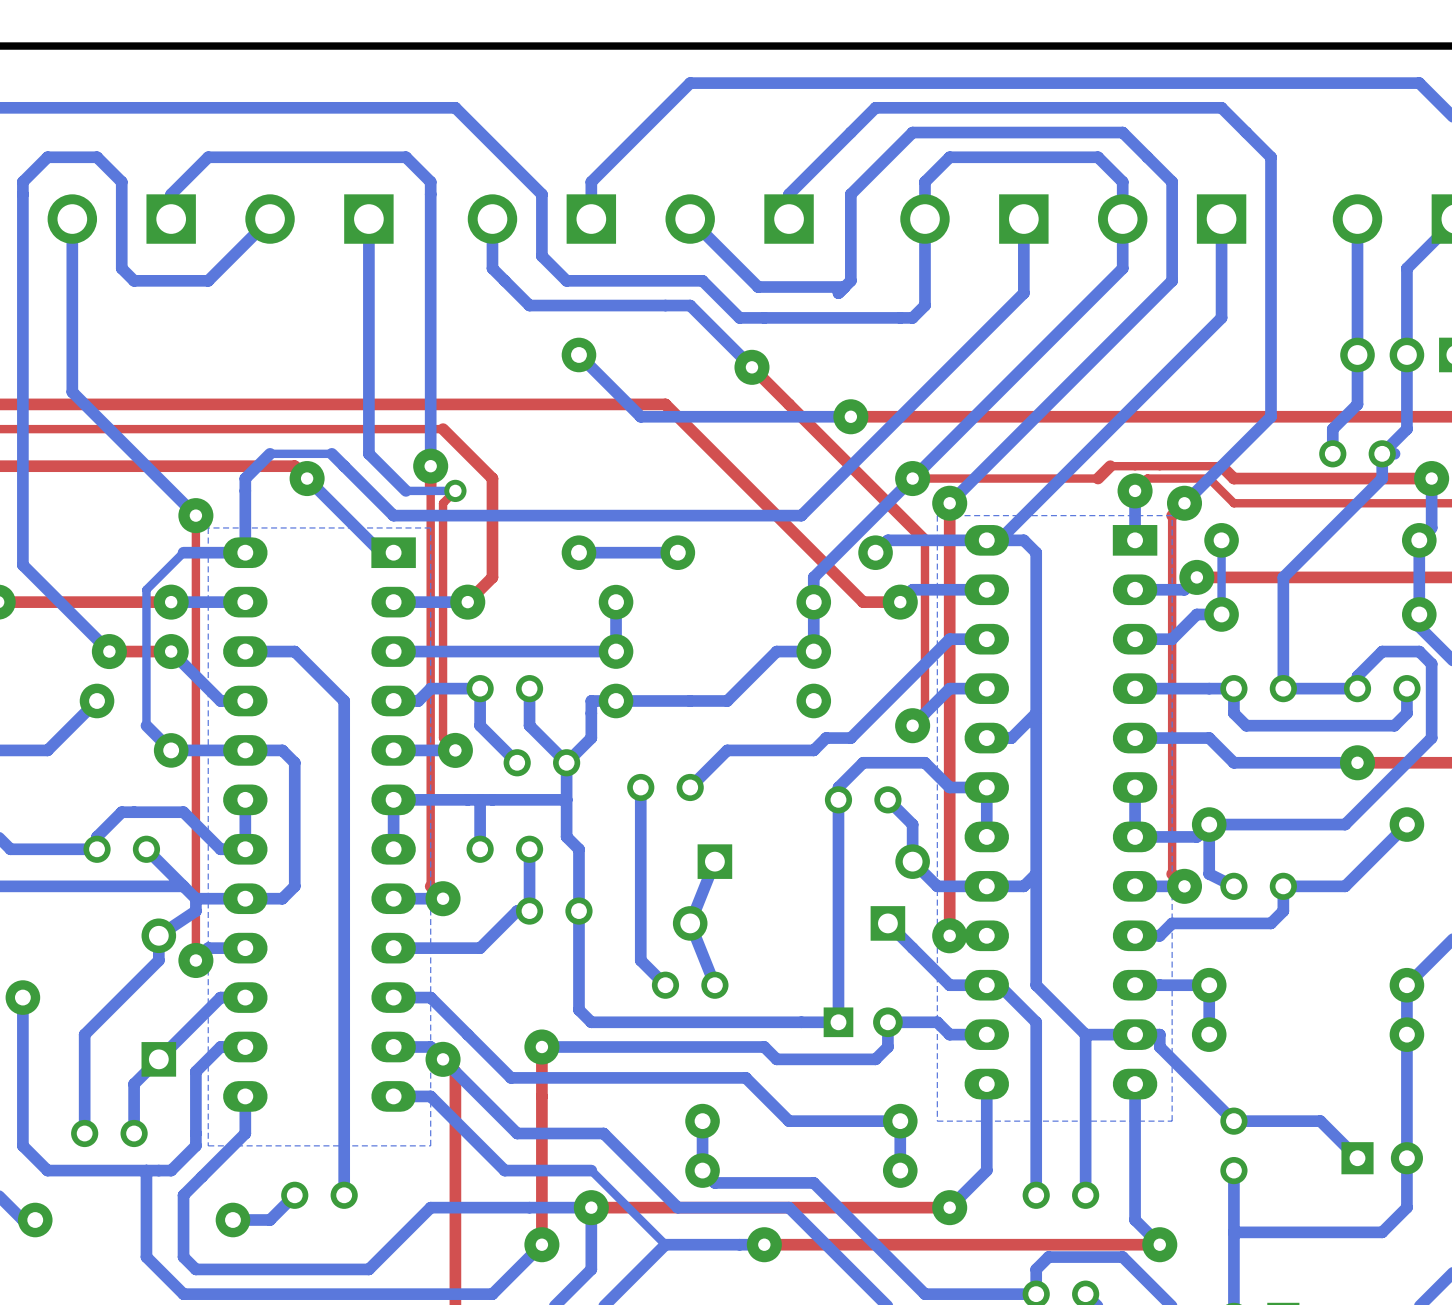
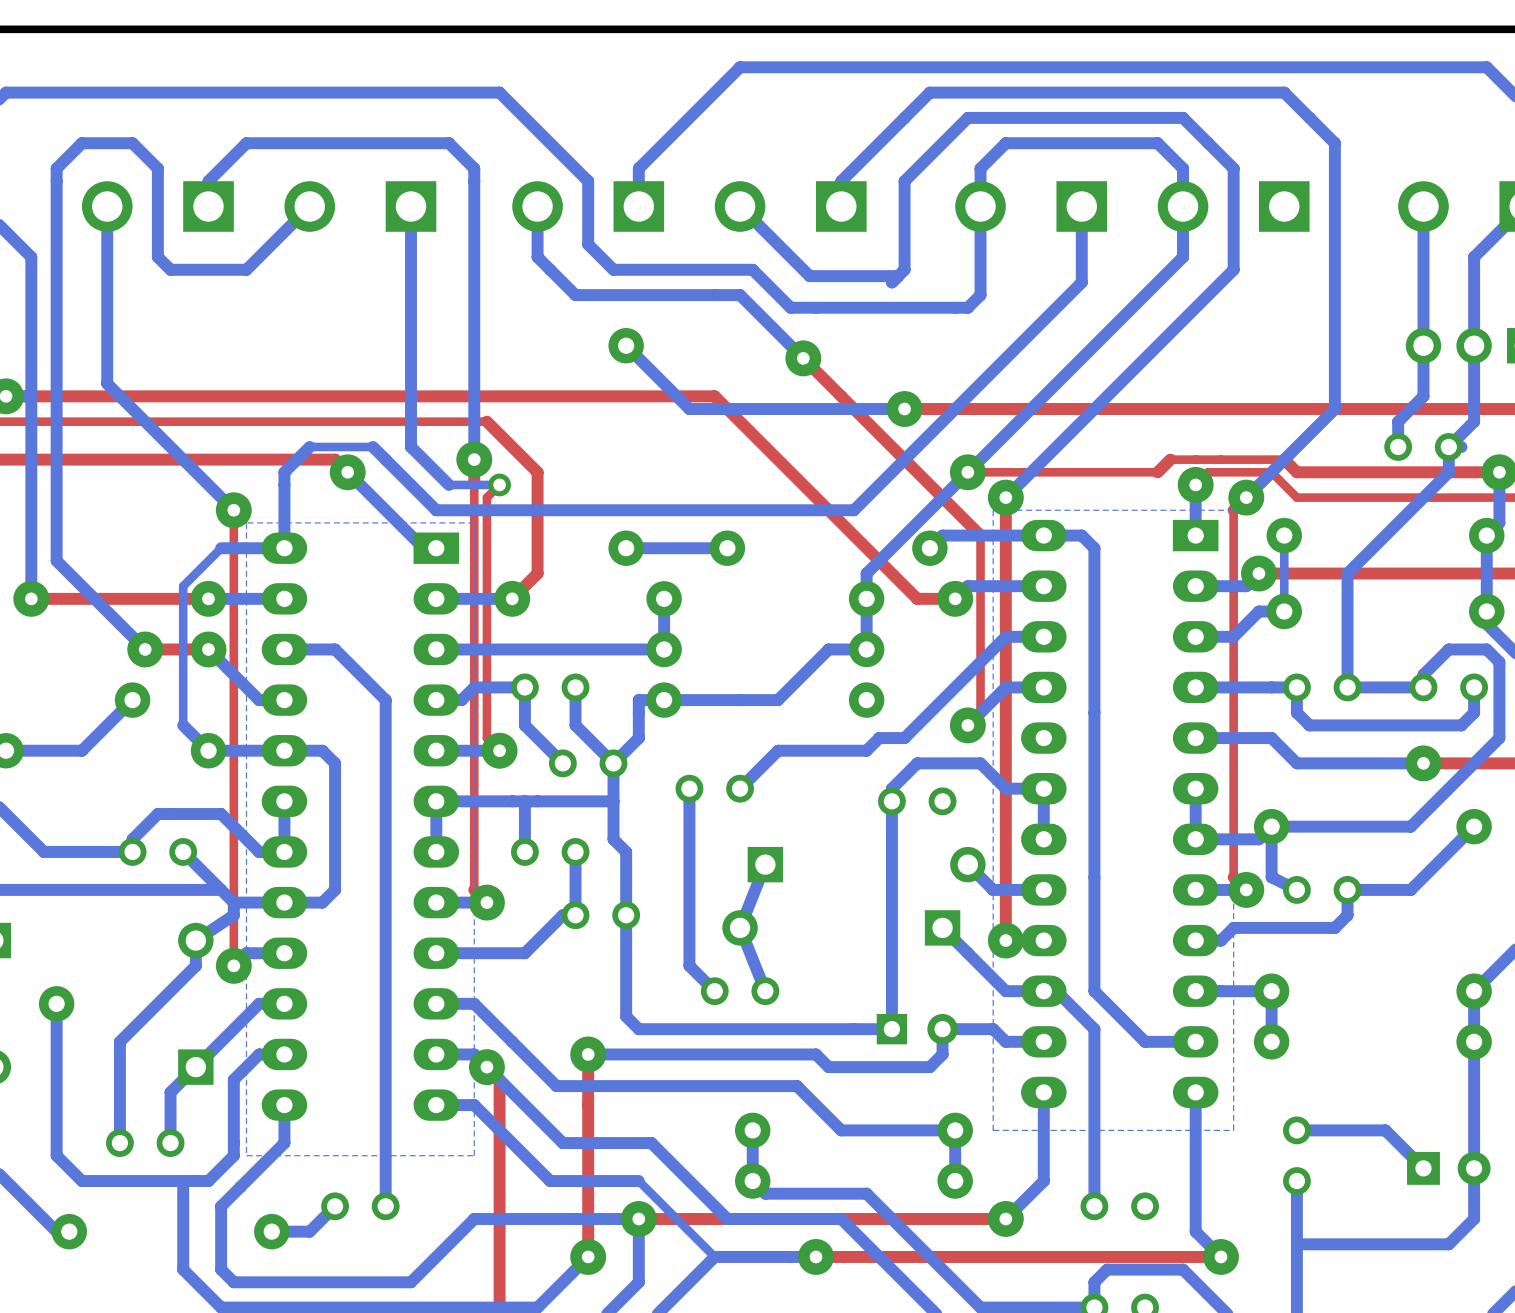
bottom track: (1221, 219) (1221, 317) (999, 540) -> none
bottom track: (1036, 713) (1011, 738) (986, 738) -> none
bottom track: (887, 799) (912, 824) (912, 861) -> none
bottom track: (1036, 873) (1023, 886) (986, 886) -> none
bottom track: (1085, 1034) (1085, 1195) -> none
bottom track: (1135, 1034) (1159, 1034) (1159, 1047) (1233, 1121) -> none

